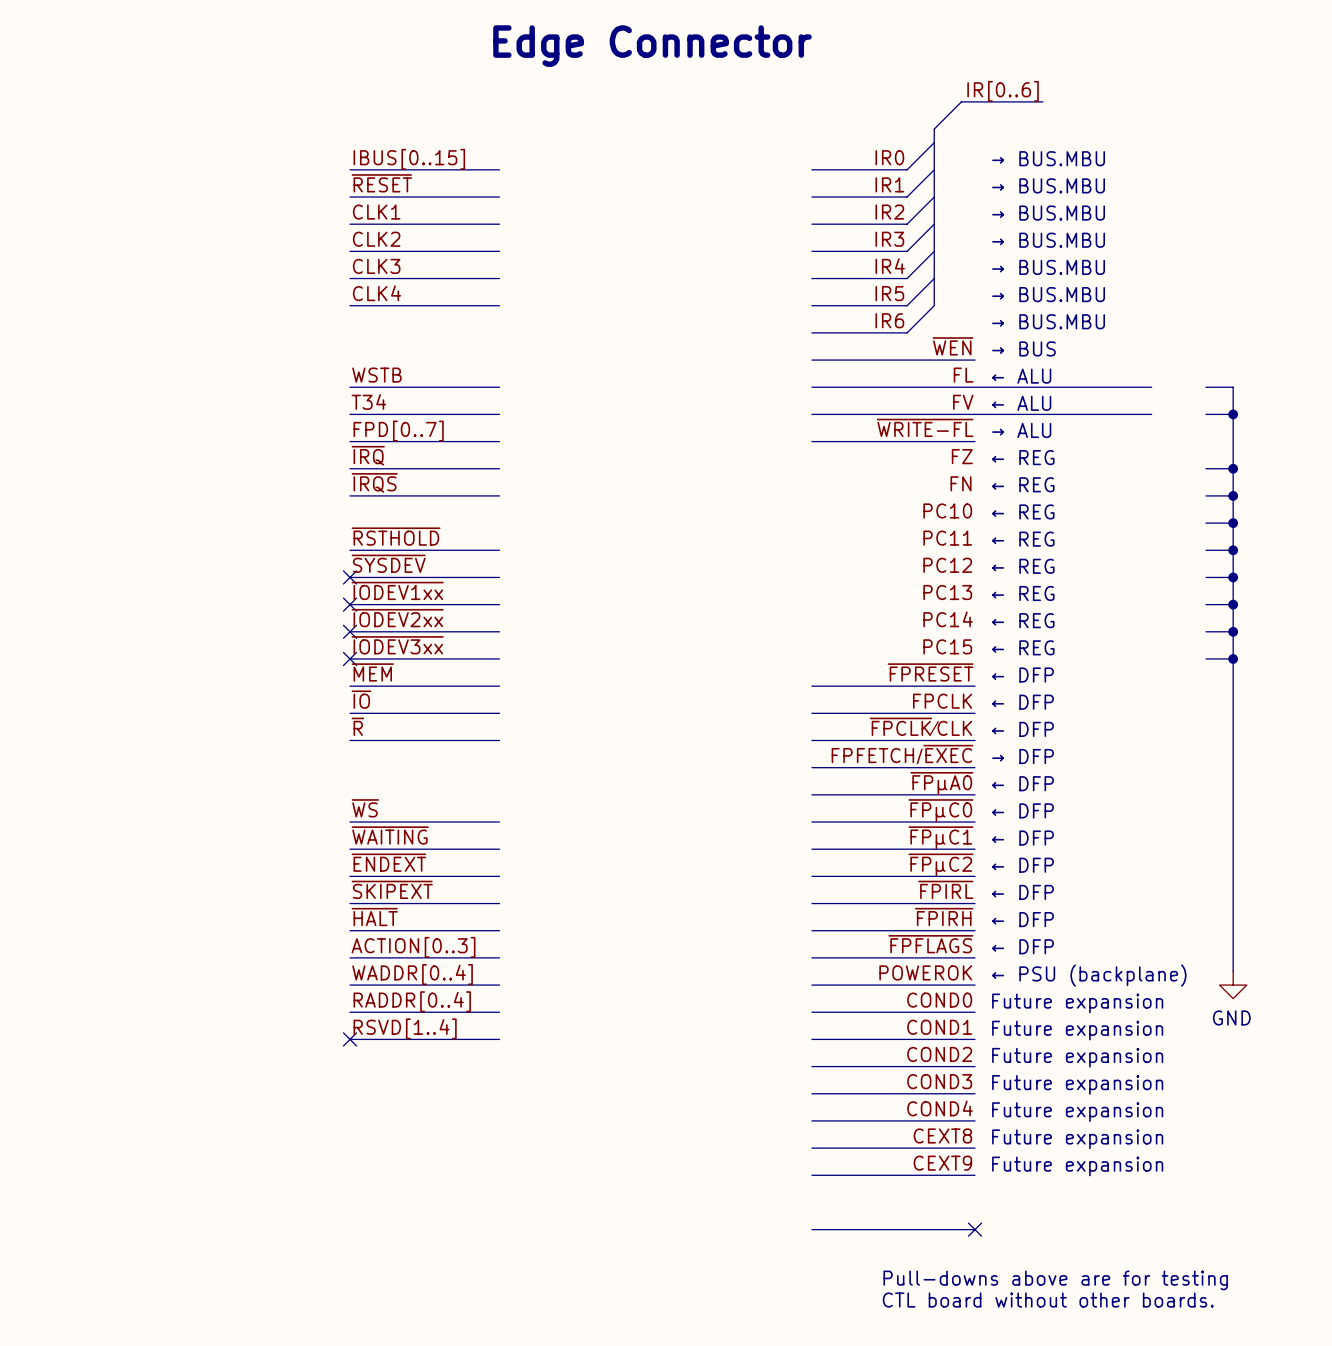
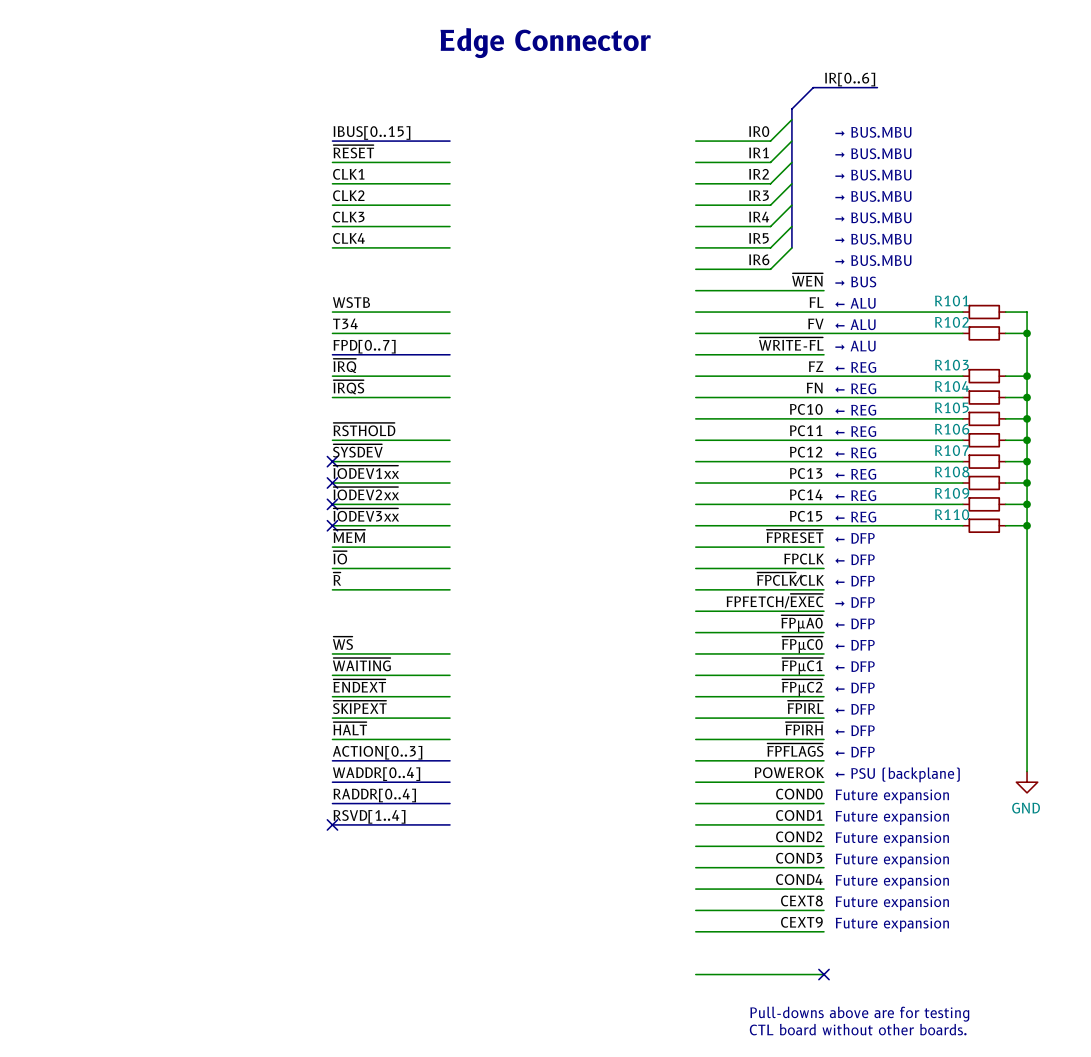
R101: none -> (984, 312)
R102: none -> (984, 333)
wire: none -> (695, 376) (962, 376)
R103: none -> (984, 376)
wire: none -> (695, 397) (962, 397)
R104: none -> (984, 397)
wire: none -> (695, 418) (962, 418)
R105: none -> (984, 418)
wire: none -> (695, 440) (962, 440)
R106: none -> (984, 440)
wire: none -> (695, 461) (962, 461)
R107: none -> (984, 461)
wire: none -> (695, 483) (962, 483)
R108: none -> (984, 483)
wire: none -> (695, 504) (962, 504)
R109: none -> (984, 504)
wire: none -> (695, 525) (962, 525)
R110: none -> (984, 525)

